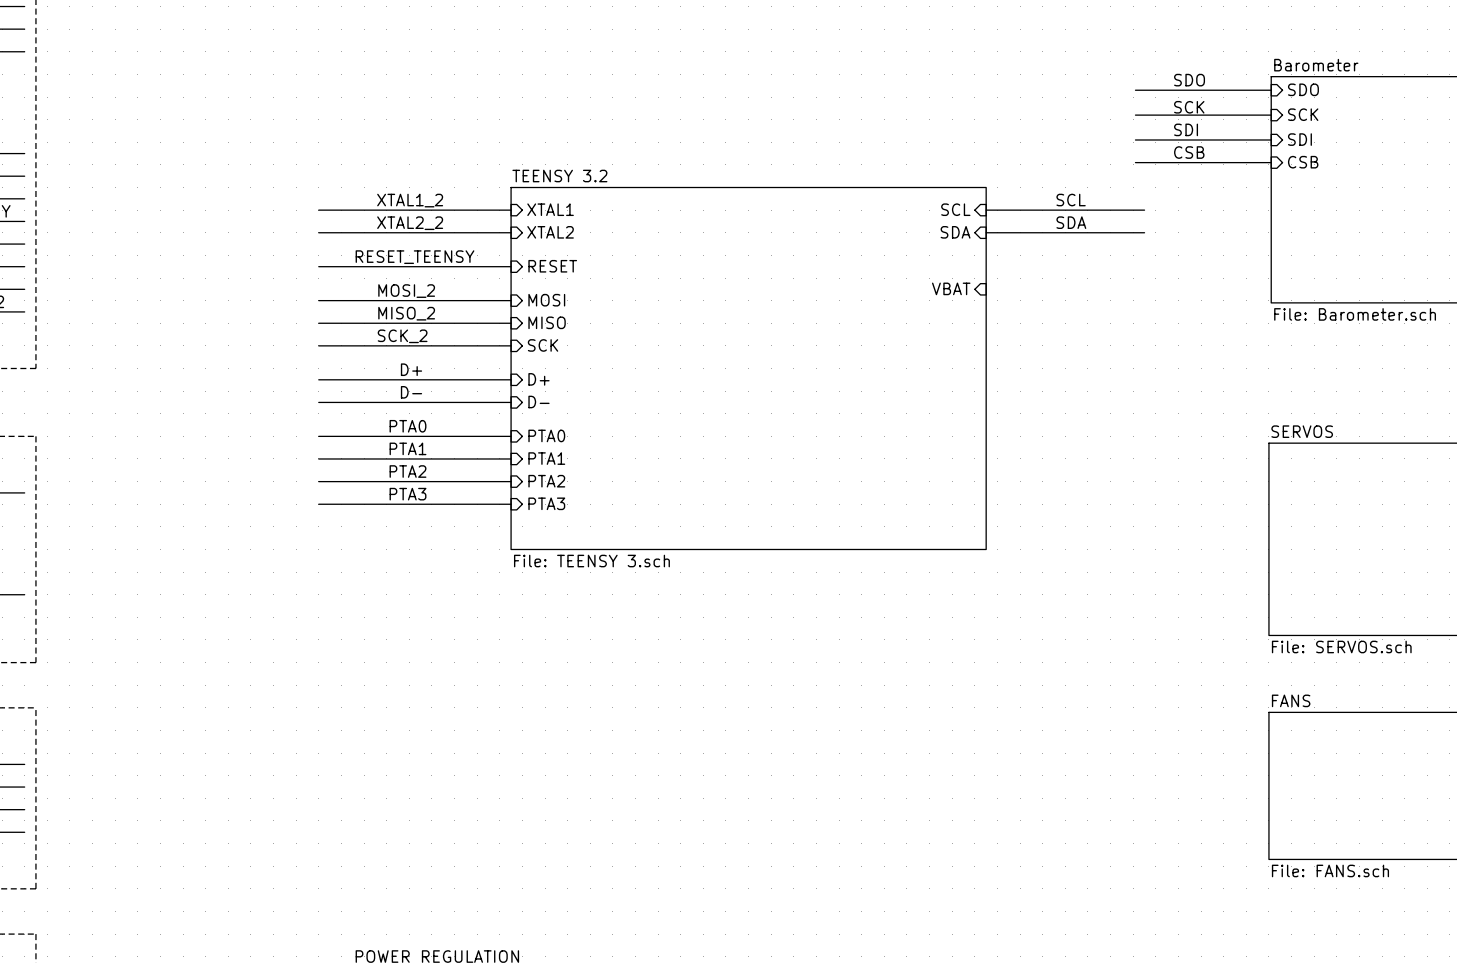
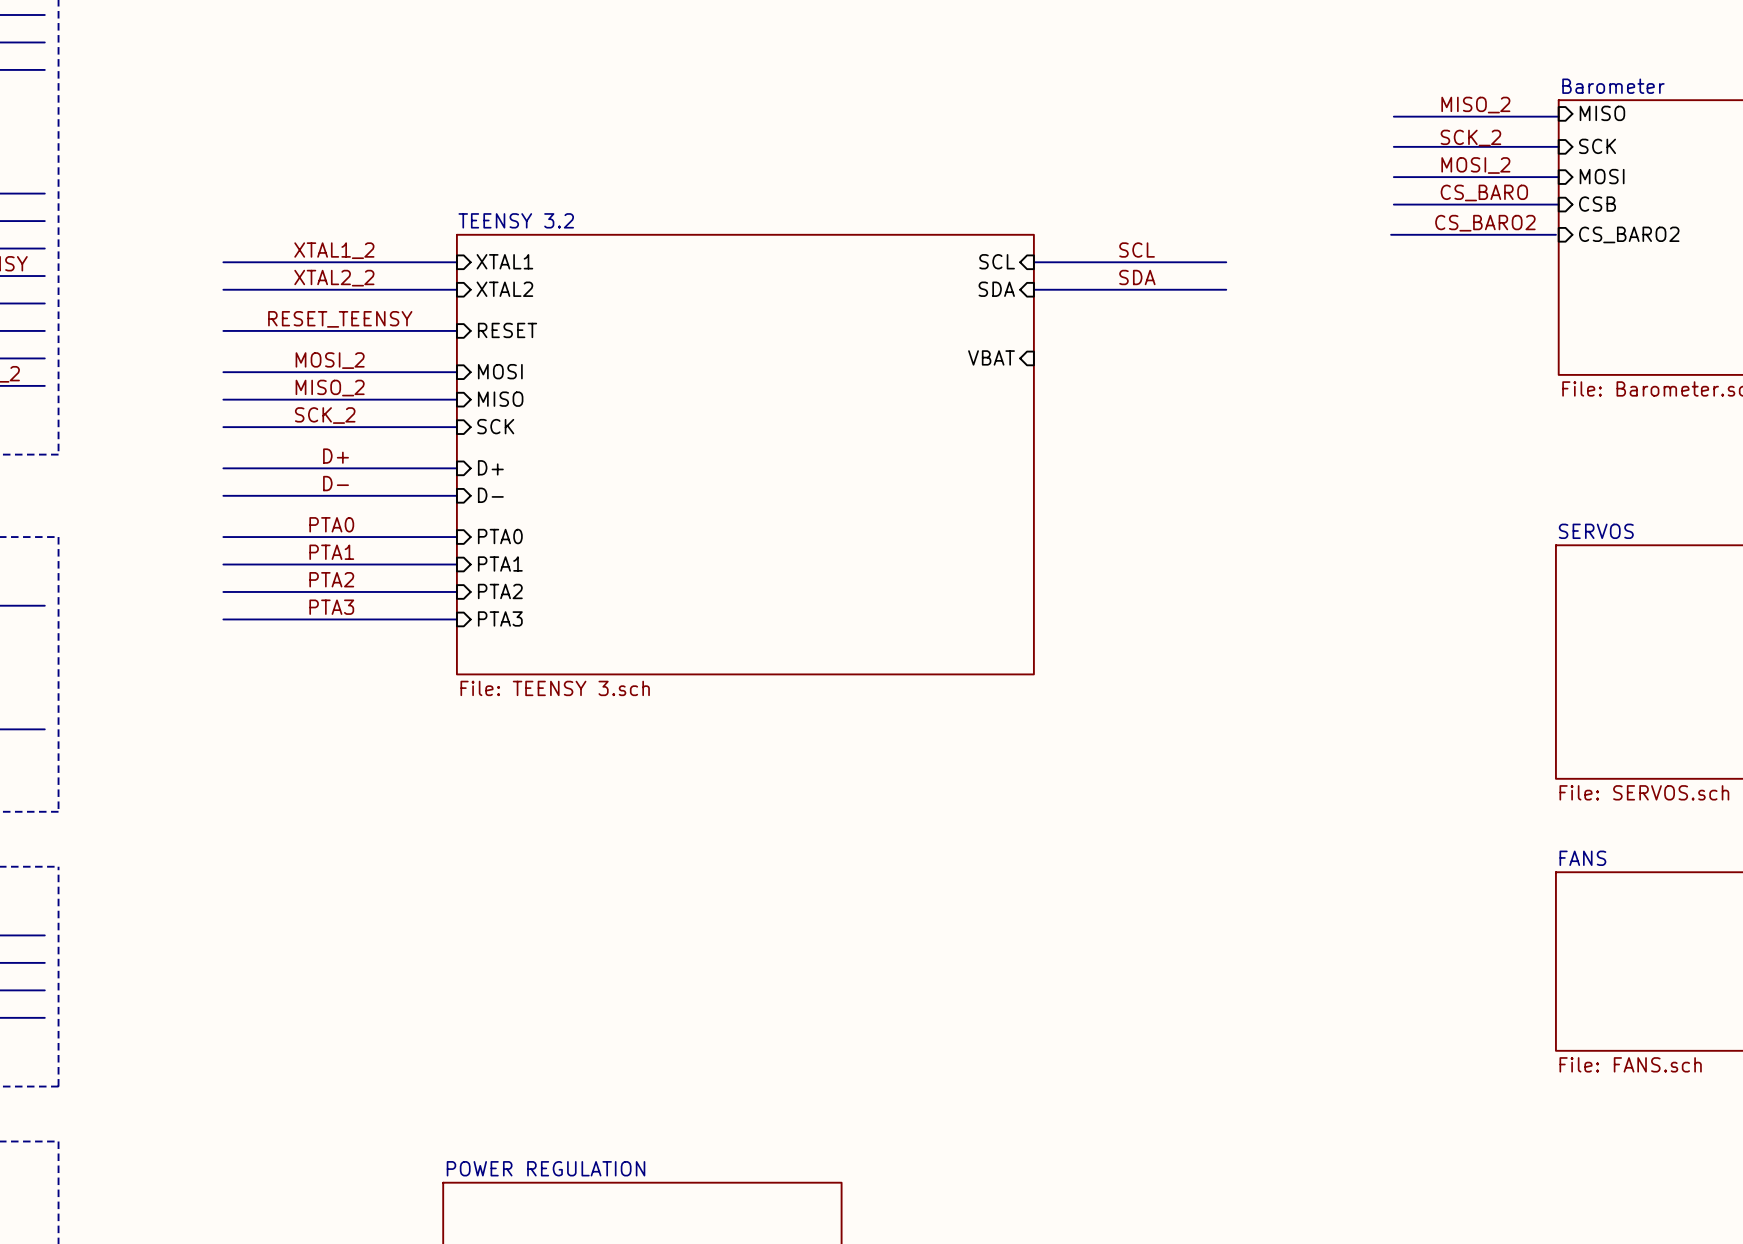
label: SDO (1189, 80) -> MISO_2 (1475, 105)
sheet pin: SDO (1303, 89) -> MISO (1602, 113)
label: SCK (1189, 107) -> SCK_2 (1470, 138)
label: SDI (1186, 129) -> MOSI_2 (1475, 165)
sheet pin: SDI (1299, 139) -> MOSI (1602, 176)
label: CSB (1189, 152) -> CS_BARO (1484, 192)
label: none -> CS_BARO2 (1485, 223)
wire: none -> (1391, 234) (1555, 234)
sheet pin: none -> CS_BARO2 (1629, 234)
label position: XTAL1_2 (410, 200) -> XTAL1_2 (334, 250)
label position: SCL (1071, 200) -> SCL (1137, 250)
sheet pin position: XTAL1 (550, 209) -> XTAL1 (504, 261)
sheet pin position: SCL (955, 209) -> SCL (997, 261)
wire: (364, 210) (511, 210) -> (223, 262) (401, 262)
wire: (997, 210) (1144, 210) -> (1033, 262) (1212, 262)
label position: SDA (1071, 222) -> SDA (1137, 277)
label position: XTAL2_2 (410, 223) -> XTAL2_2 (334, 278)
wire: (364, 232) (511, 232) -> (223, 289) (401, 289)
sheet pin position: XTAL2 (550, 232) -> XTAL2 (504, 289)
sheet pin position: SDA (955, 232) -> SDA (996, 289)
wire: (997, 232) (1144, 232) -> (1033, 289) (1212, 289)
label position: RESET_TEENSY (415, 257) -> RESET_TEENSY (340, 319)
wire: (364, 266) (511, 266) -> (223, 330) (401, 330)
sheet pin position: RESET (552, 266) -> RESET (507, 330)
sheet pin position: VBAT (951, 288) -> VBAT (991, 357)
label position: MOSI_2 (406, 291) -> MOSI_2 (330, 360)
wire: (364, 300) (511, 300) -> (223, 372) (401, 372)
sheet pin position: MOSI (546, 300) -> MOSI (500, 371)
label position: MISO_2 (406, 313) -> MISO_2 (330, 388)
sheet pin position: MISO (547, 322) -> MISO (500, 399)
wire: (364, 323) (511, 323) -> (223, 399) (401, 399)
label position: SCK_2 (402, 336) -> SCK_2 (325, 415)
wire: (364, 345) (511, 345) -> (223, 427) (401, 427)
sheet pin position: SCK (543, 345) -> SCK (495, 426)
sheet TEENSY 3.2 position: (748, 368) -> (745, 454)
label position: D+ (411, 369) -> D+ (336, 456)
wire: (364, 379) (511, 379) -> (223, 468) (401, 468)
sheet pin position: D+ (538, 379) -> D+ (490, 467)
label position: D- (411, 392) -> D- (336, 483)
wire: (364, 402) (511, 402) -> (223, 495) (401, 495)
sheet pin position: D- (538, 402) -> D- (490, 495)
label position: PTA0 (408, 426) -> PTA0 (331, 524)
sheet pin position: PTA0 (546, 435) -> PTA0 (500, 536)
wire: (364, 436) (511, 436) -> (223, 537) (401, 537)
label position: PTA1 (408, 448) -> PTA1 (331, 552)
wire: (364, 458) (511, 458) -> (223, 564) (401, 564)
sheet pin position: PTA1 (546, 458) -> PTA1 (500, 563)
label position: PTA2 (408, 471) -> PTA2 (331, 579)
wire: (364, 481) (511, 481) -> (223, 591) (401, 591)
sheet pin position: PTA2 (546, 481) -> PTA2 (500, 591)
label position: PTA3 (408, 494) -> PTA3 (331, 607)
sheet pin position: PTA3 (546, 503) -> PTA3 (500, 618)
wire: (364, 504) (511, 504) -> (223, 619) (401, 619)

